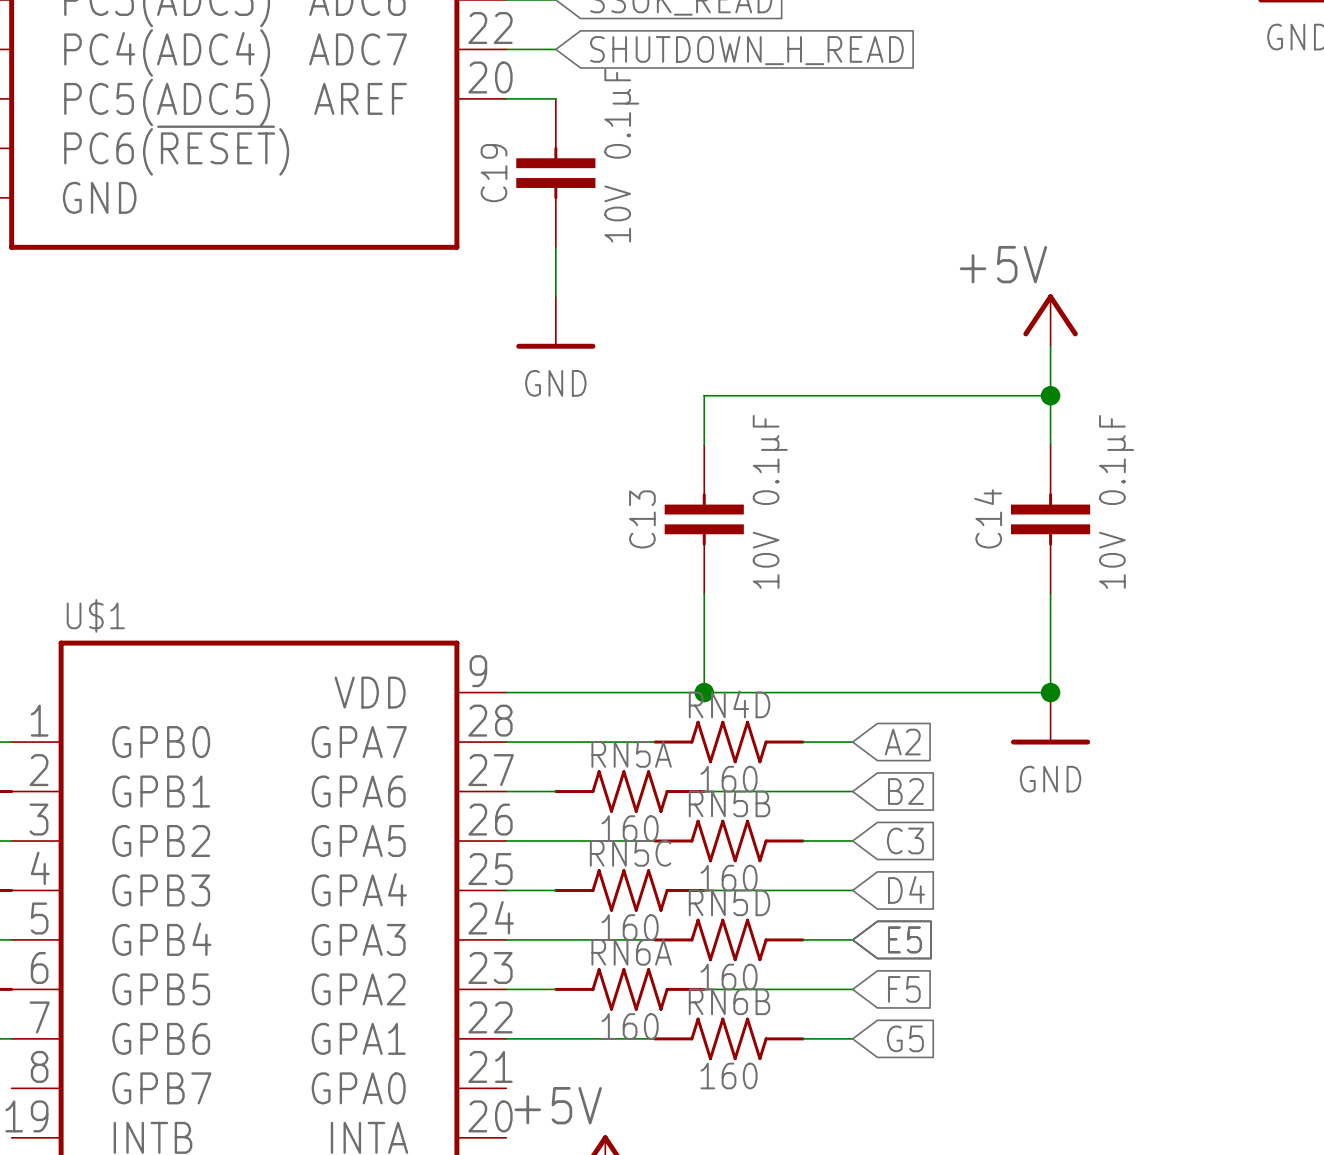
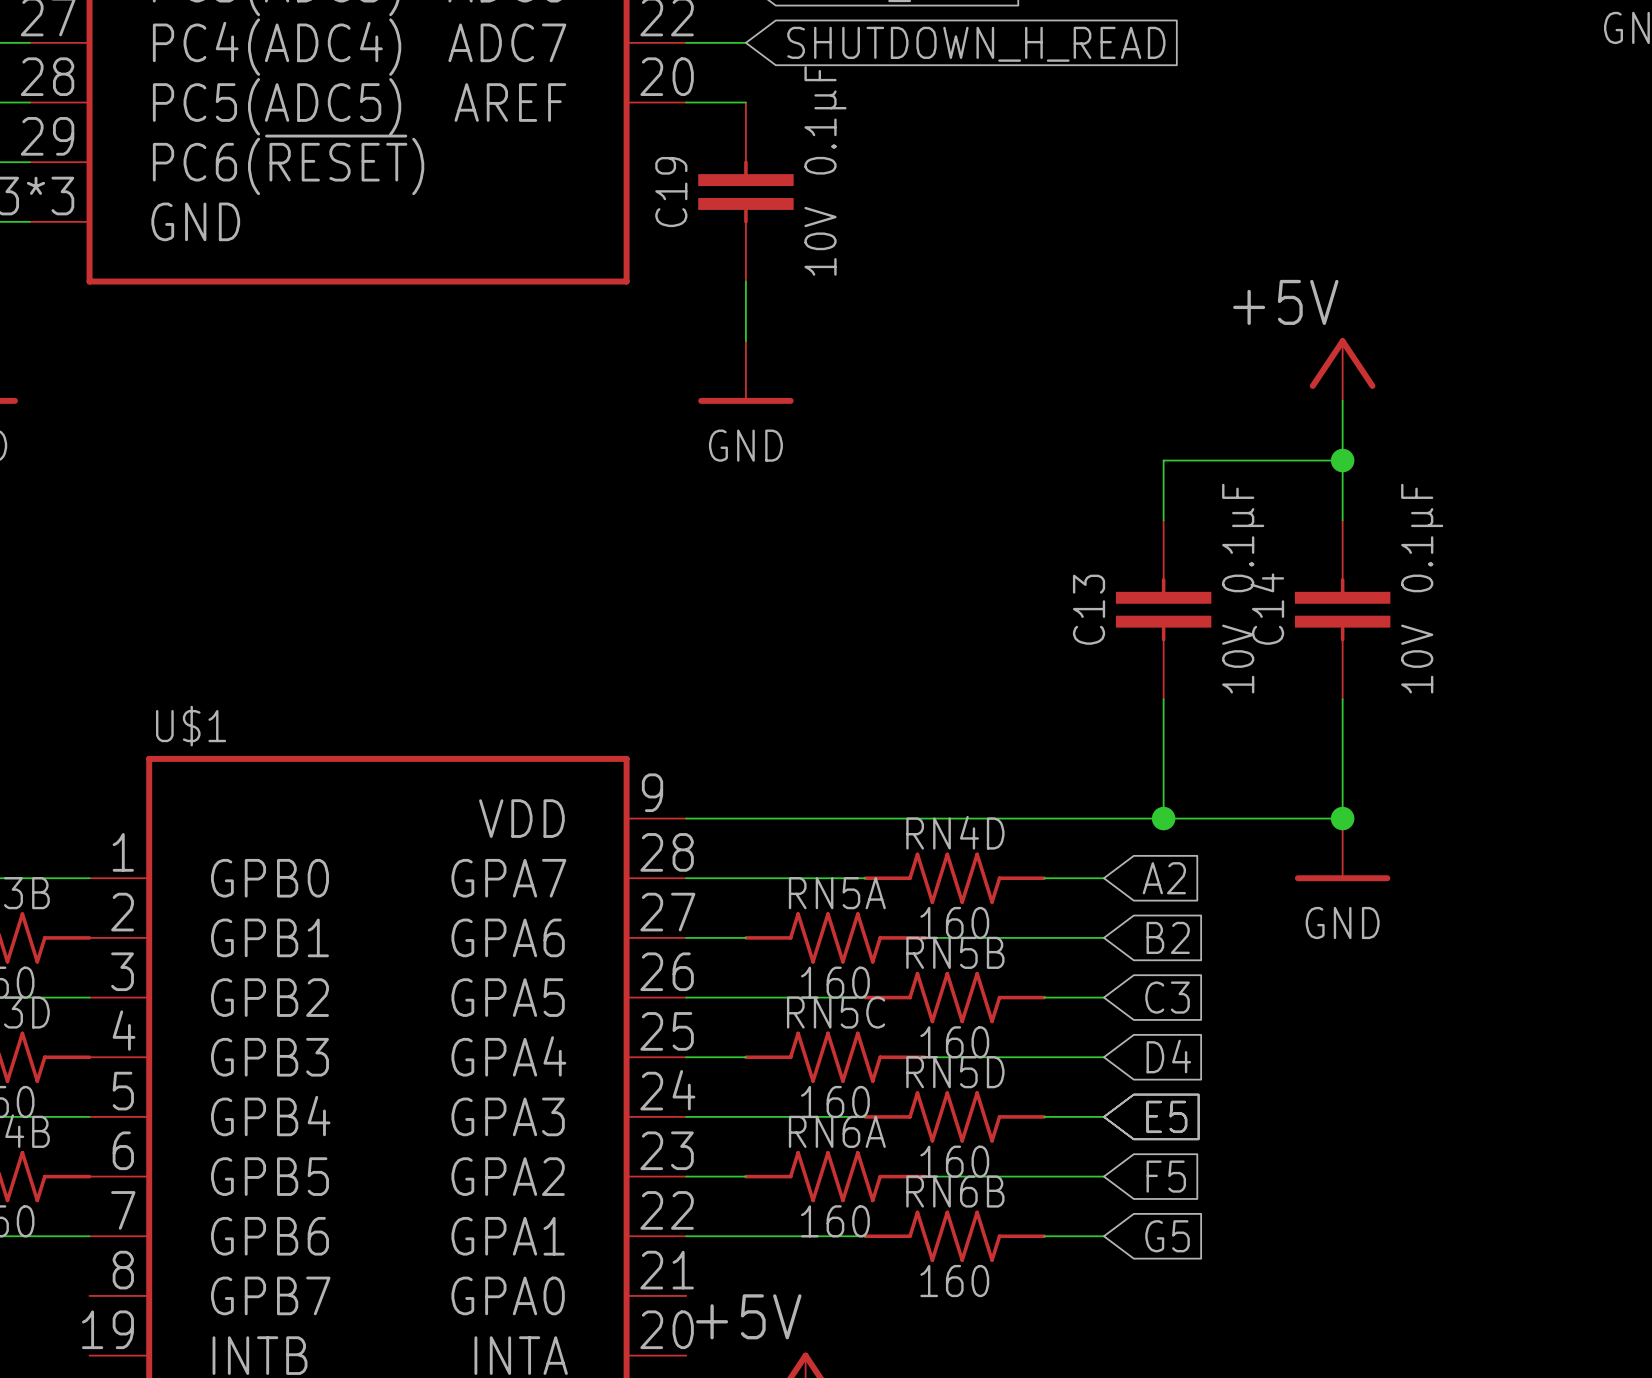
wire: (902, 395) (704, 395) (704, 445) -> (1163, 460) (1163, 520)
C13 position: (704, 519) -> (1163, 609)
wire: (704, 593) (704, 692) -> (1163, 699) (1163, 818)
junction: (704, 692) -> none
junction: none -> (1163, 818)

